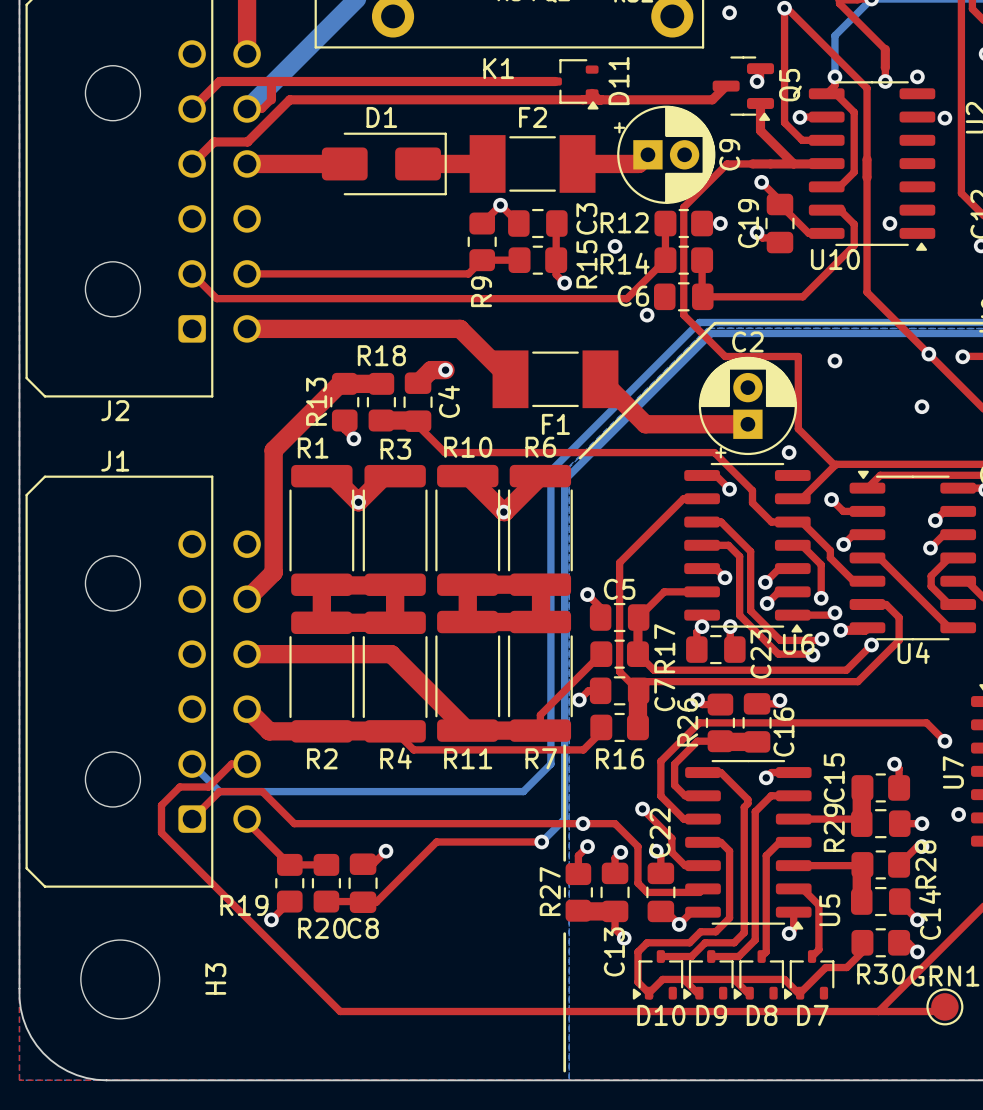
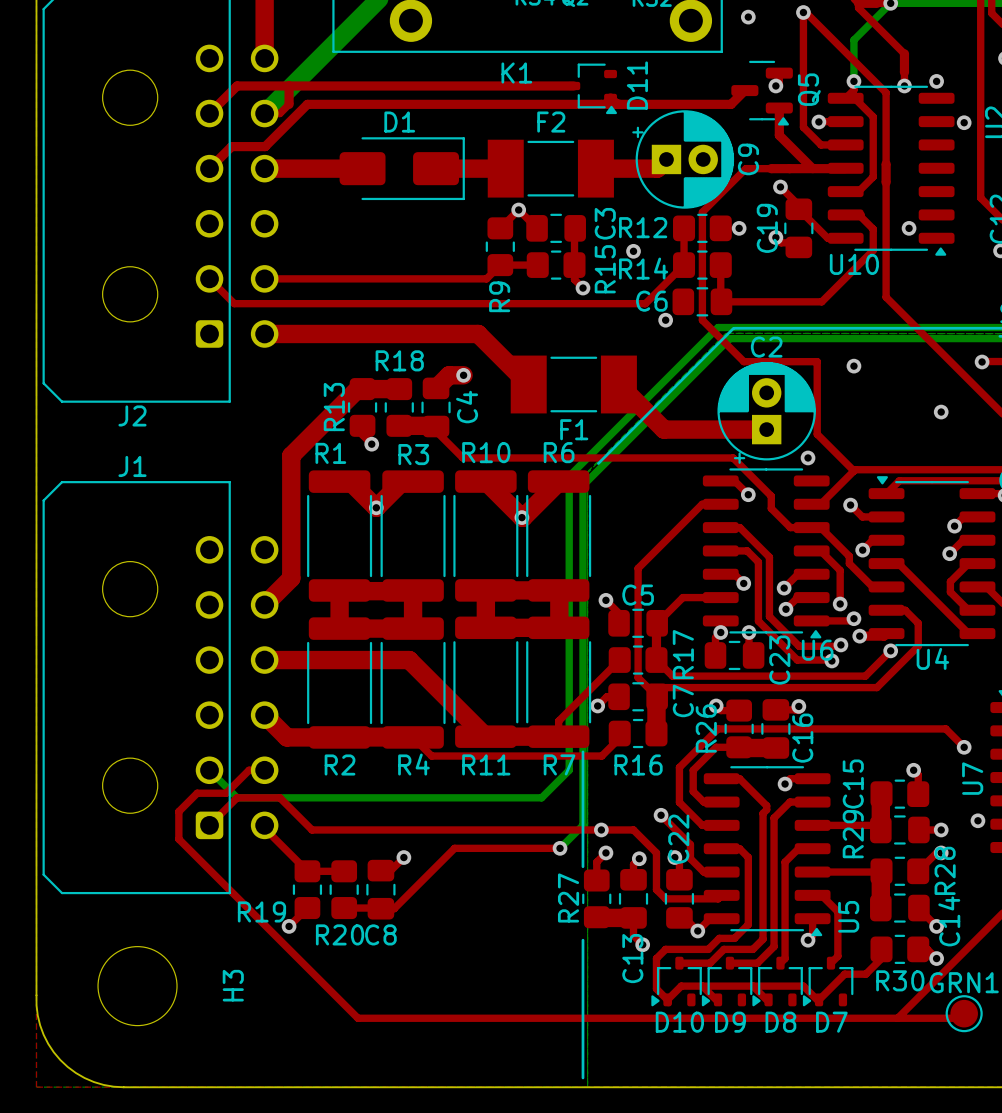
via: (928, 354) -> none

